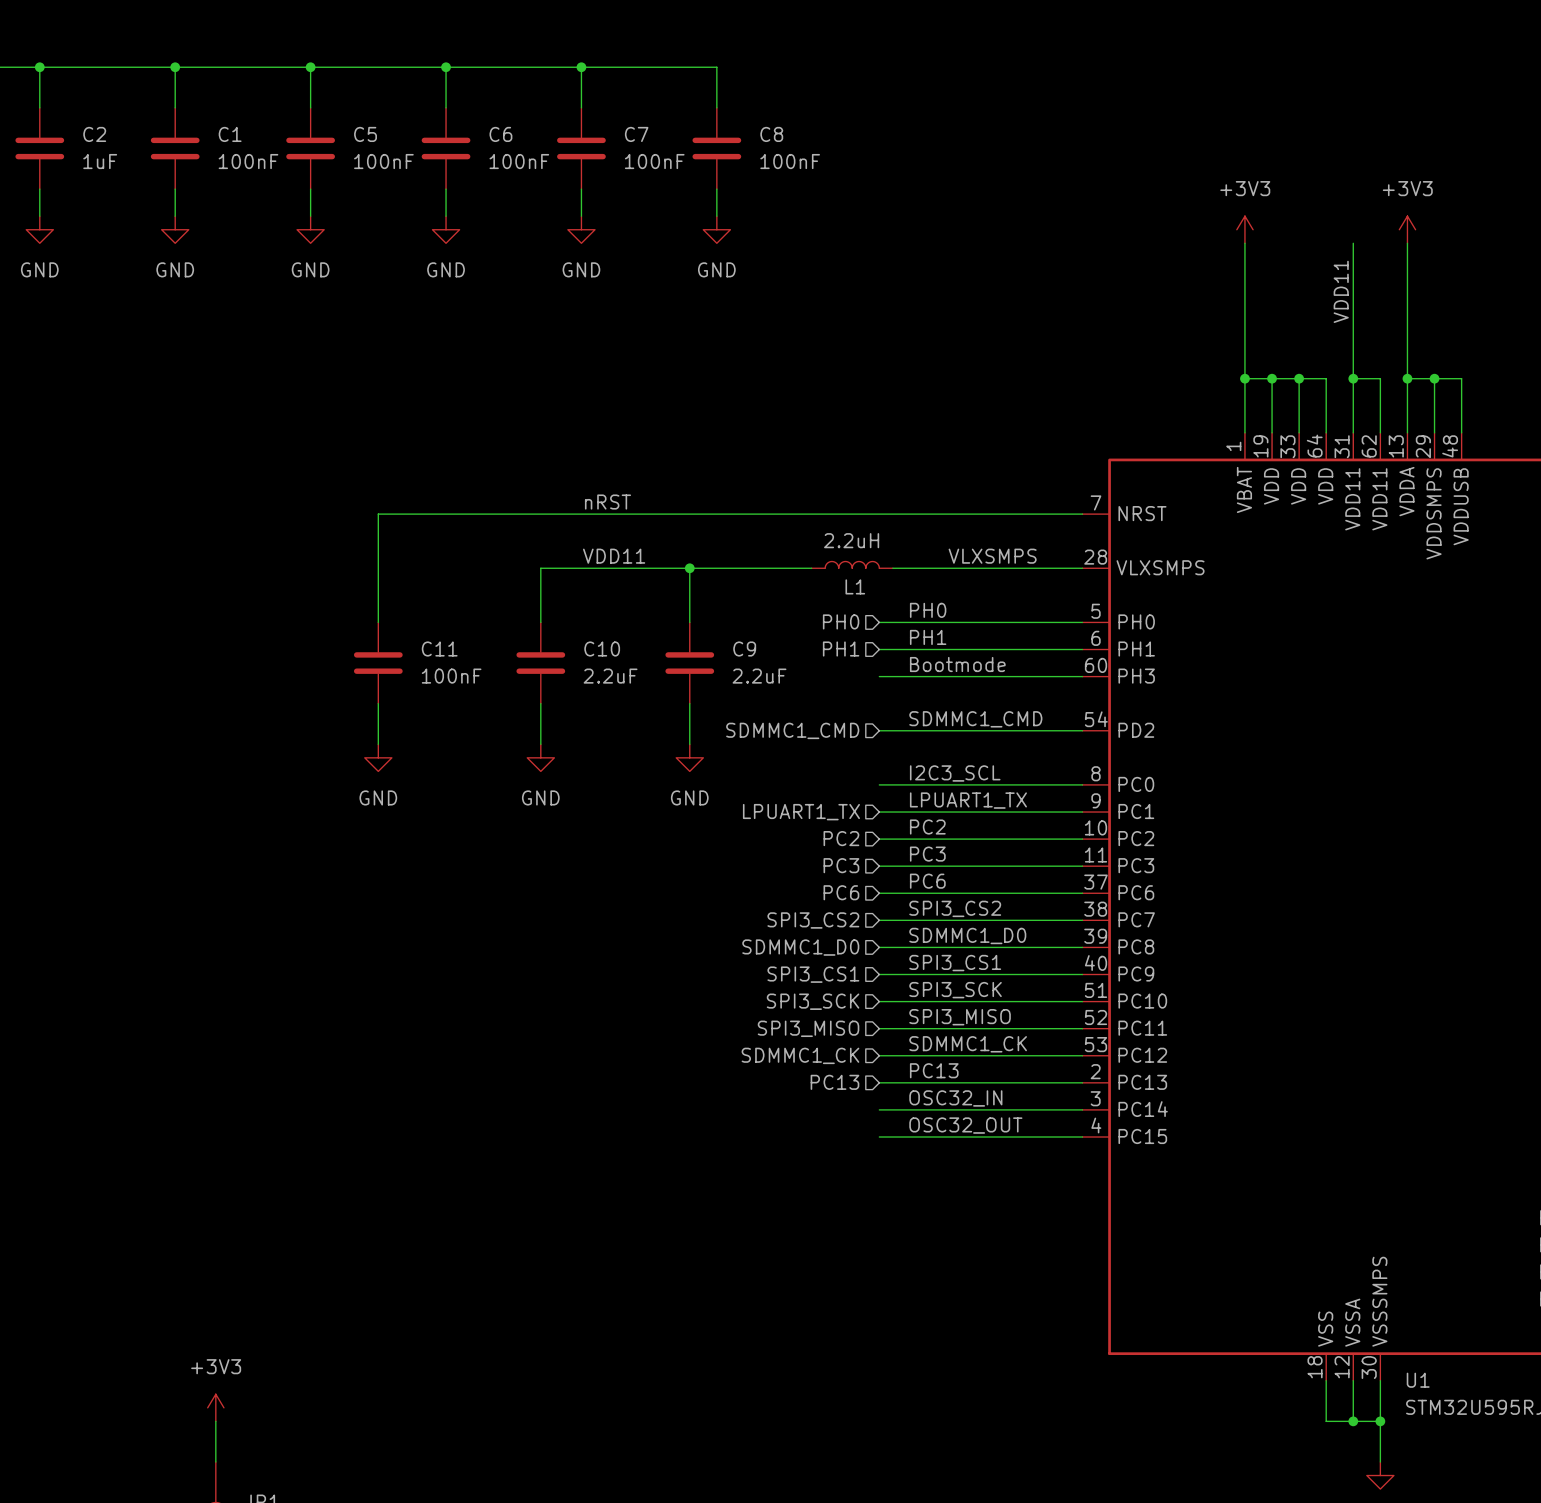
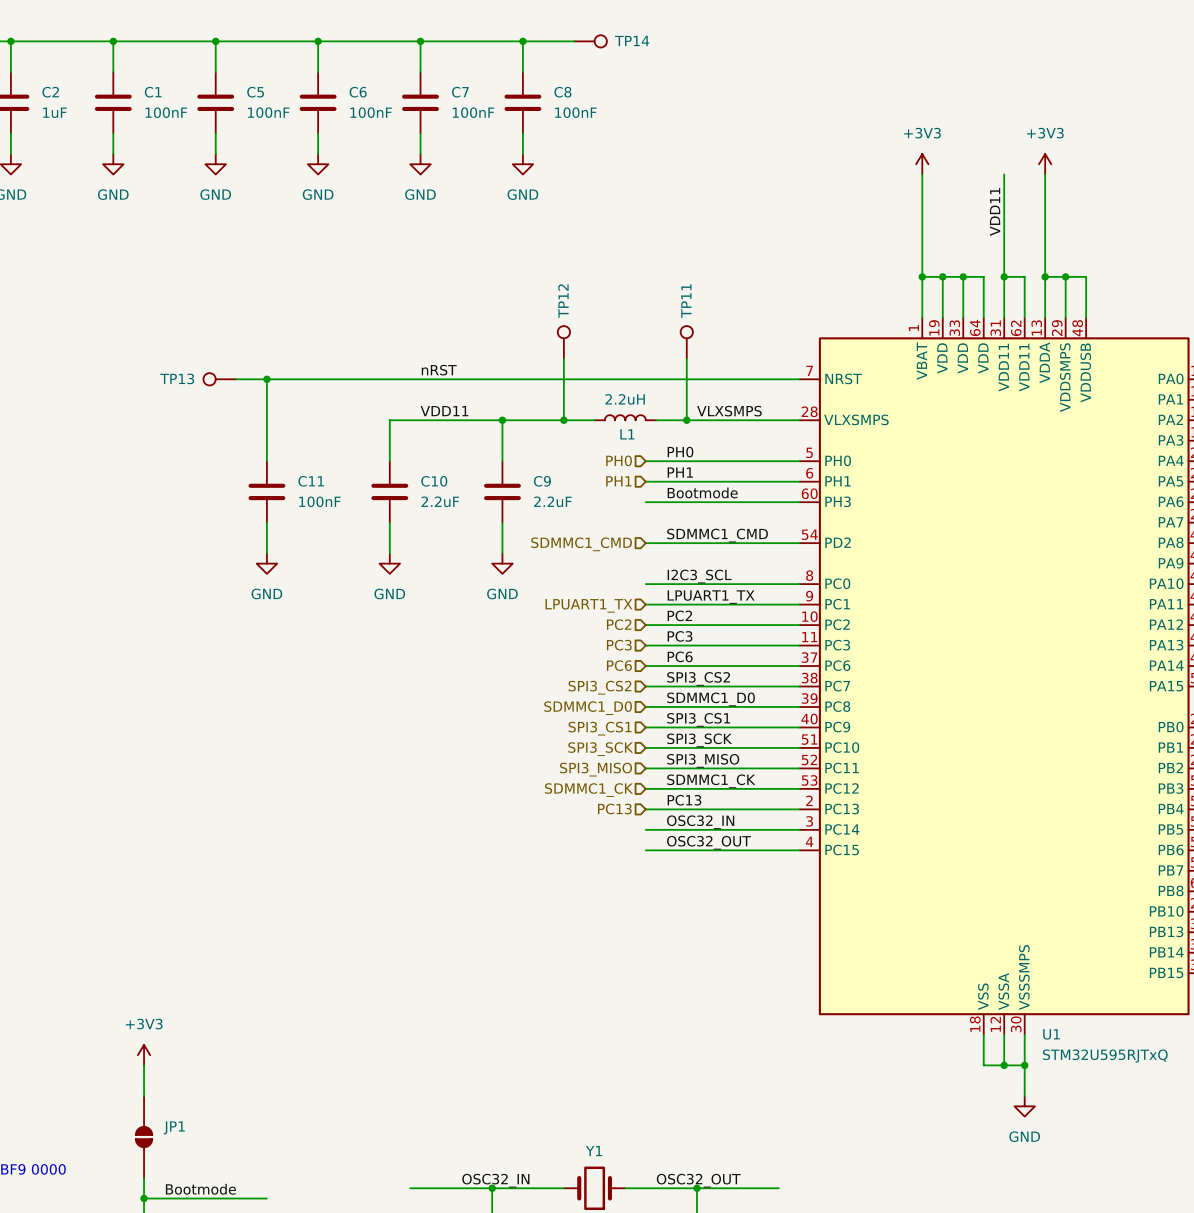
wire: none -> (522, 41) (574, 41)
junction: none -> (522, 41)
TP14: none -> (590, 41)
TP12: none -> (563, 342)
TP11: none -> (686, 342)
wire: none -> (563, 358) (563, 420)
wire: none -> (686, 358) (686, 420)
TP13: none -> (219, 379)
wire: none -> (236, 379) (266, 379)
junction: none -> (266, 379)
junction: none -> (563, 420)
junction: none -> (686, 420)

